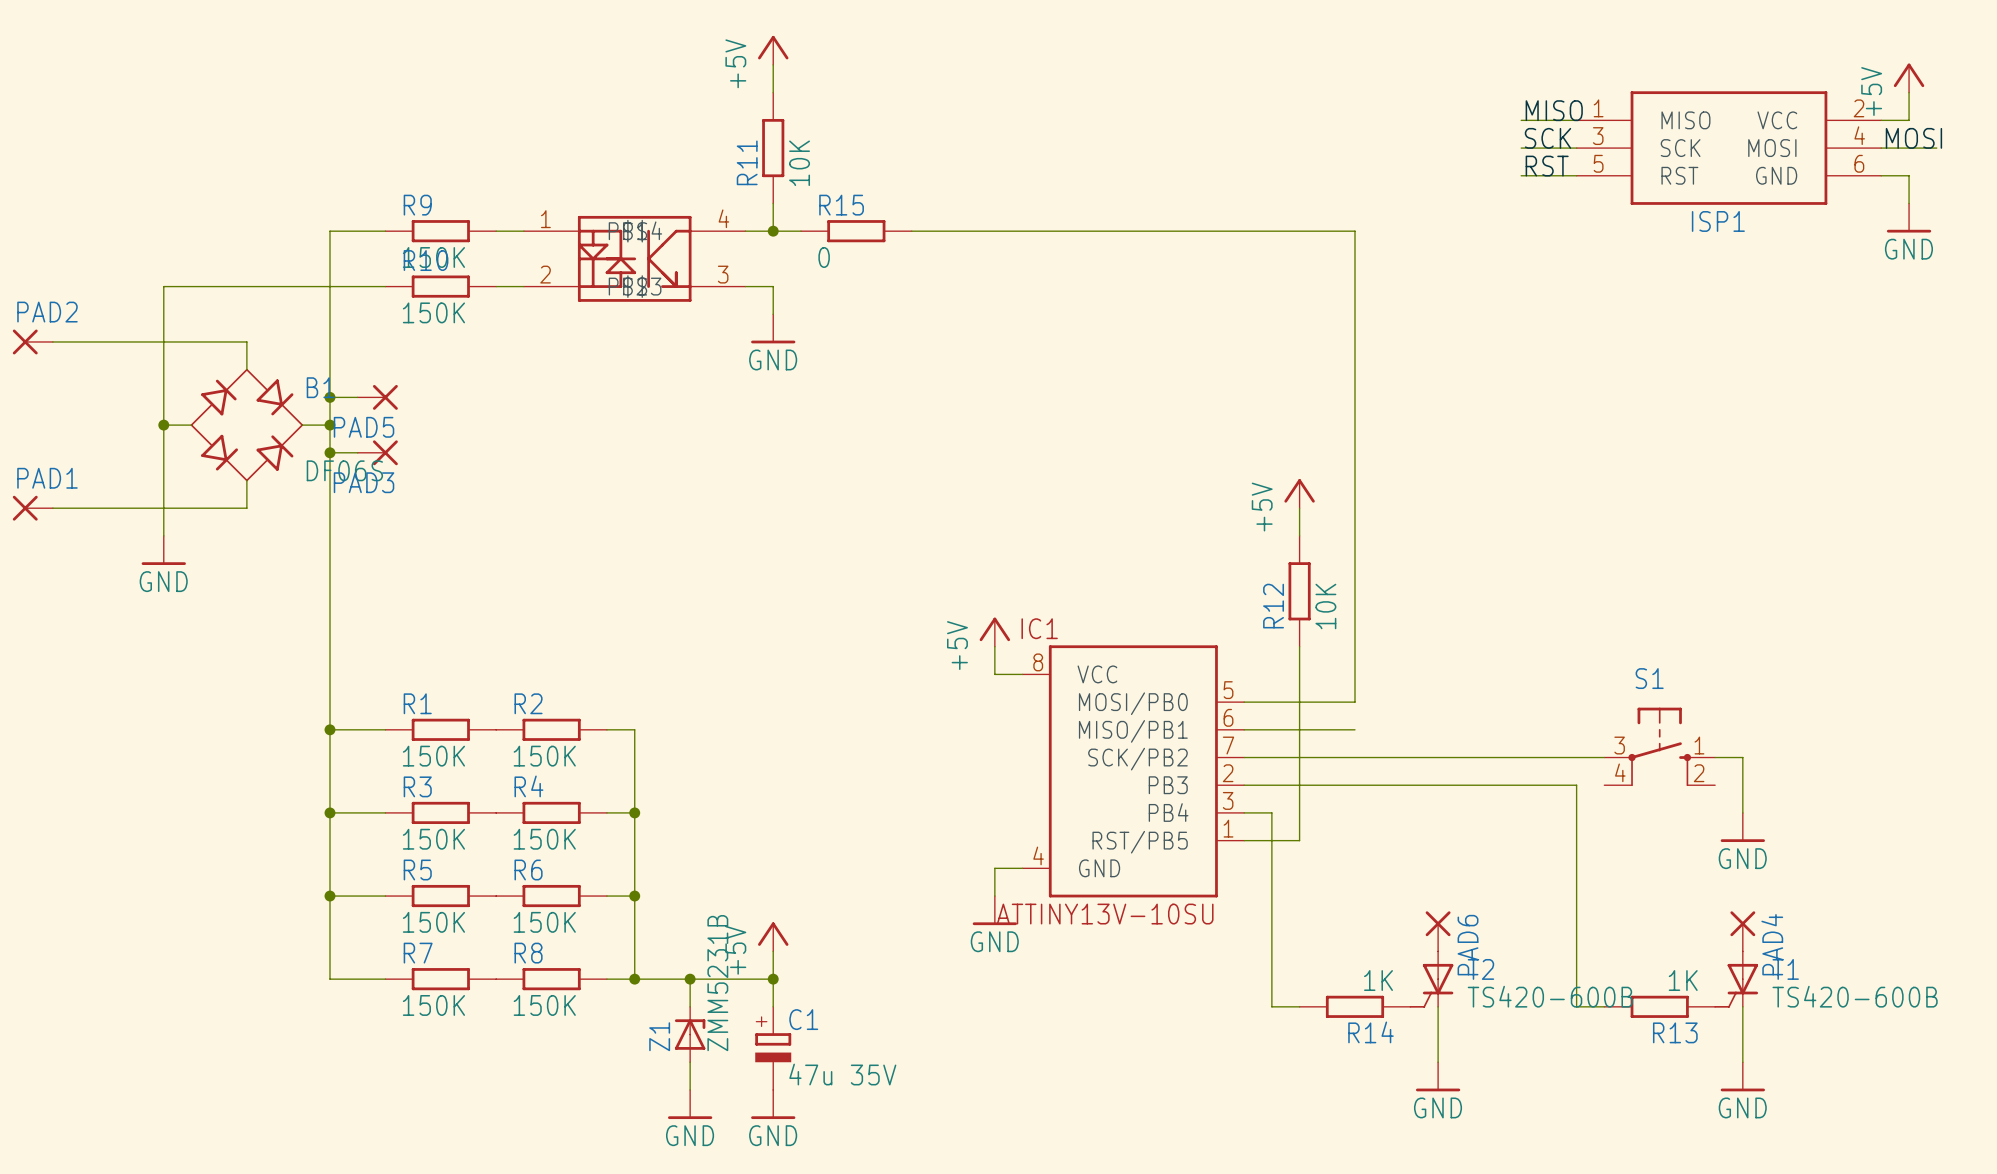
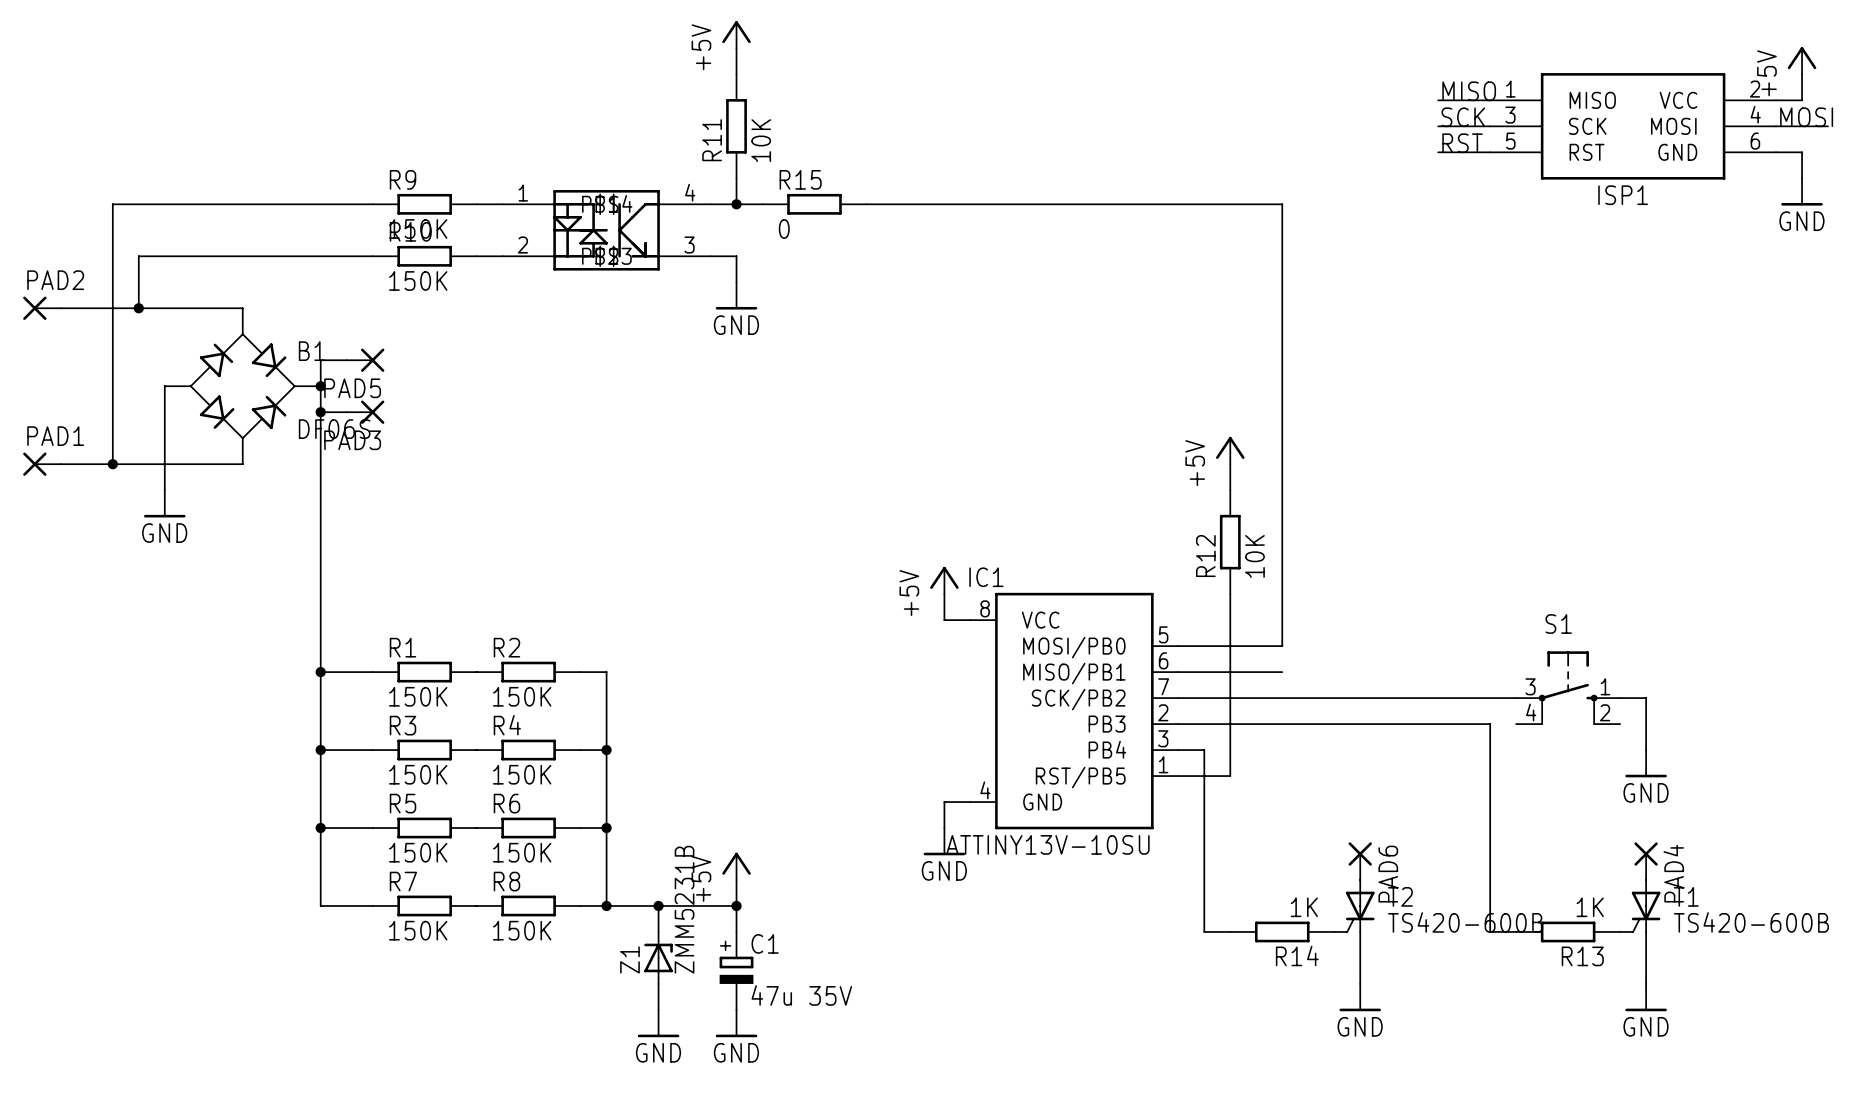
wire: (329, 231) (329, 397) -> (320, 204) (112, 204) (112, 464)
wire: (163, 286) (163, 425) -> (164, 256) (138, 256) (138, 308)
junction: none -> (138, 308)
junction: (329, 397) -> none
junction: (163, 425) -> none
junction: none -> (112, 464)

